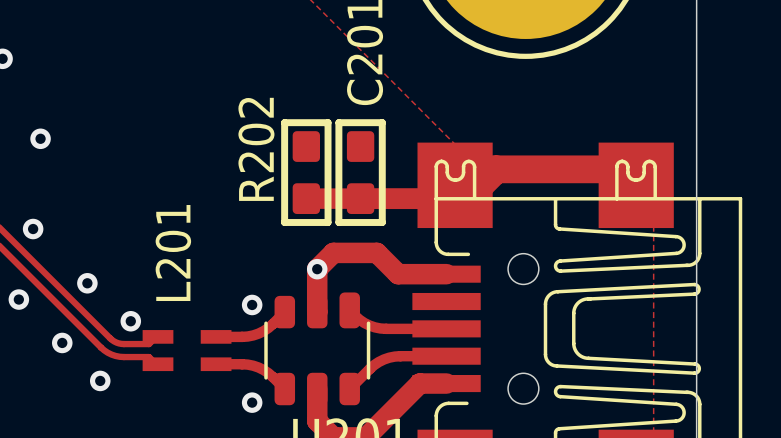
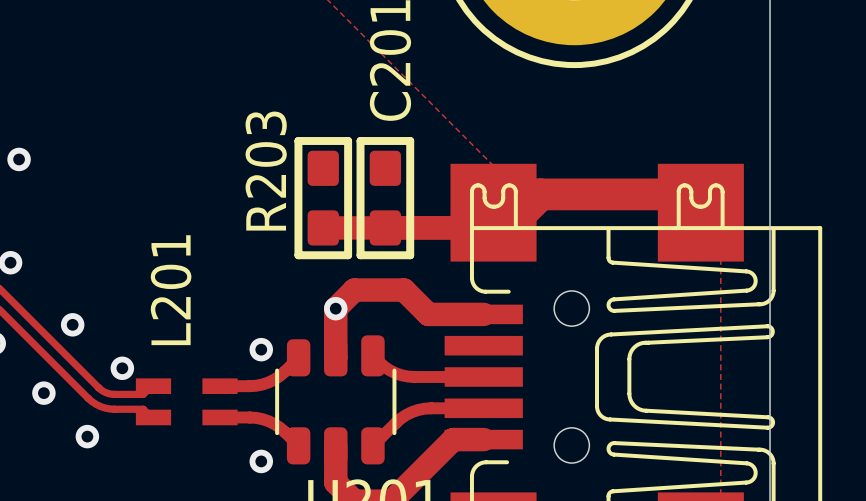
R202 name: R202 (256, 149) -> R203 (266, 171)

